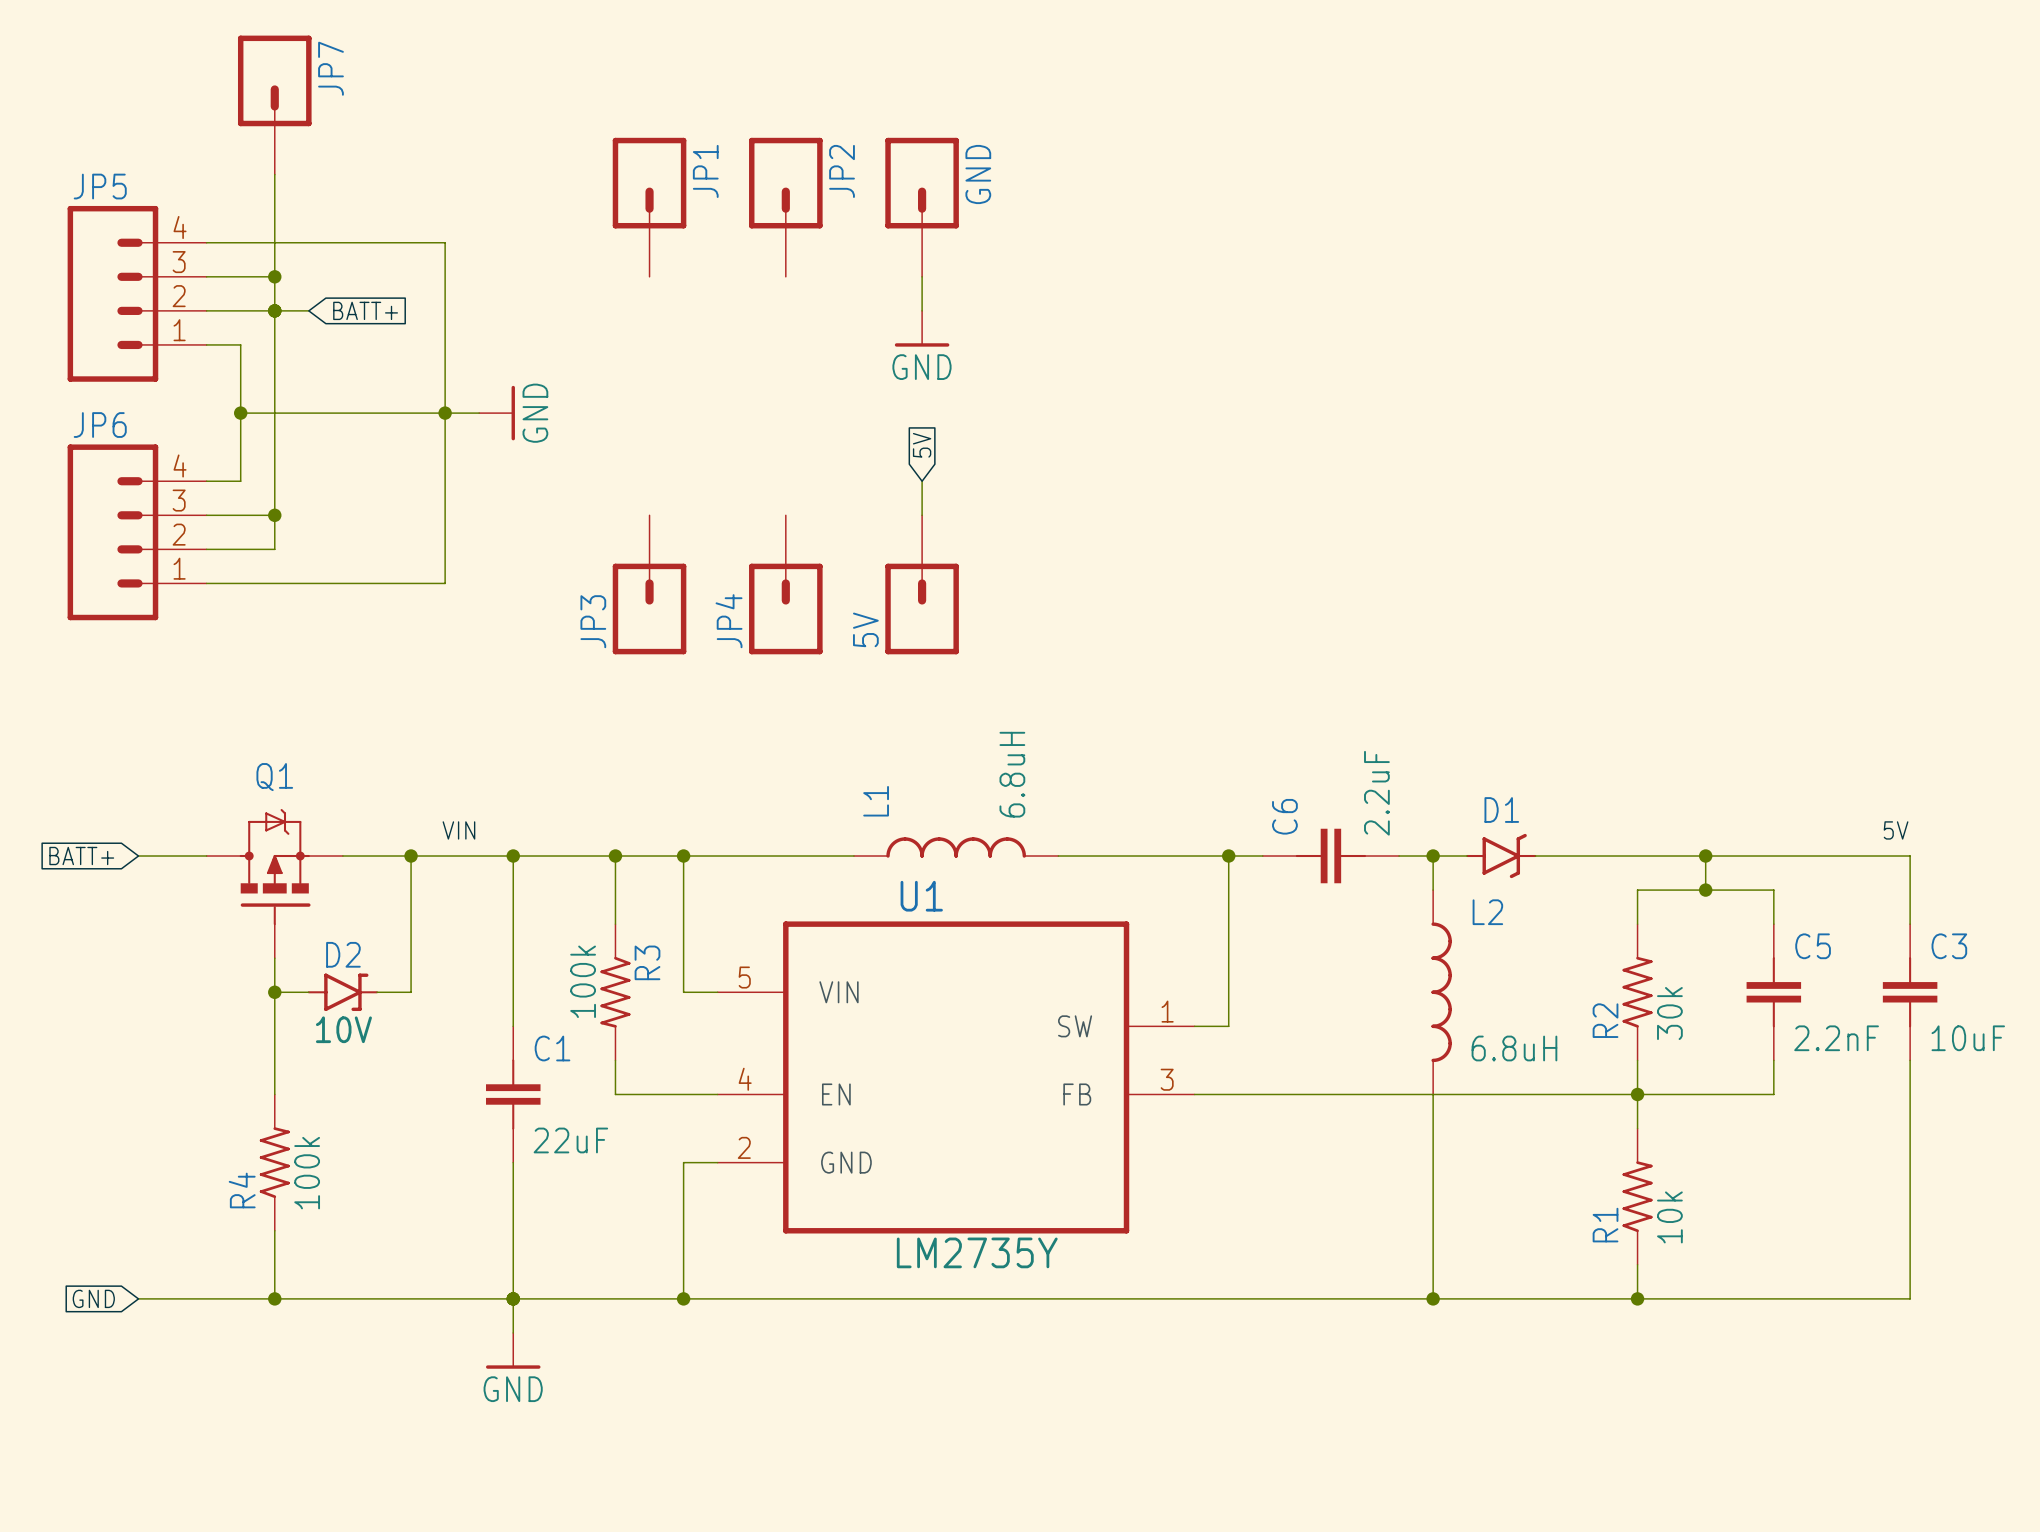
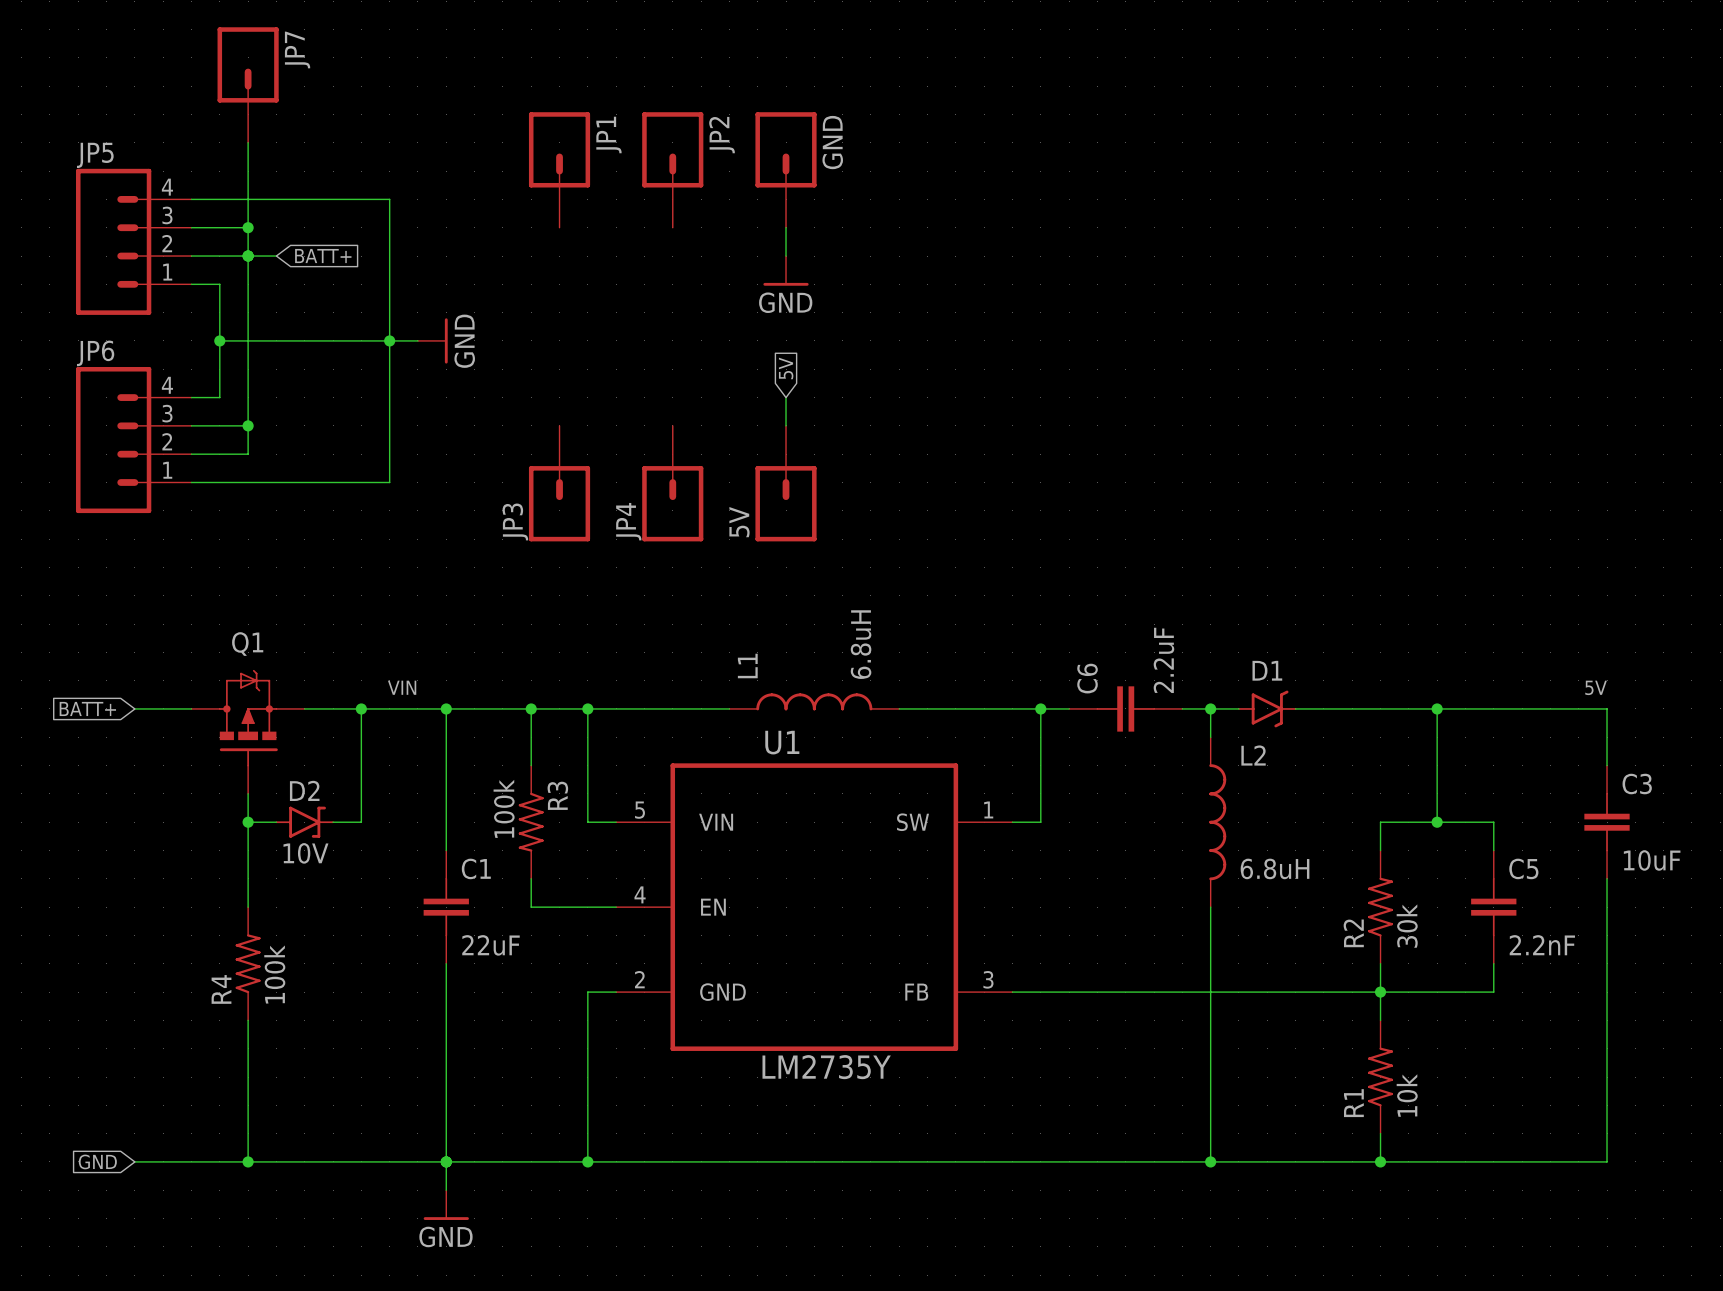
wire: none -> (1437, 737) (1437, 822)
junction: (1705, 890) -> none
U1 symbol: [717, 921, 1195, 1234] -> [616, 763, 1013, 1051]
wire: (1637, 924) (1637, 890) (1773, 890) (1773, 924) -> (1380, 850) (1380, 822) (1493, 822) (1493, 850)
wire: (1228, 992) (1228, 1026) (1194, 1026) -> (1040, 822) (1012, 822)
R2 position: (1637, 992) -> (1380, 907)
junction: none -> (1437, 822)
C5 position: (1773, 992) -> (1493, 907)
wire: (1637, 1060) (1637, 1128) -> (1380, 963) (1380, 1020)
wire: (1773, 1060) (1773, 1094) (1194, 1094) -> (1493, 963) (1493, 992) (1012, 992)
junction: (1637, 1094) -> none
wire: (717, 1162) (683, 1162) (683, 1196) -> (616, 992) (587, 992)
R1 position: (1637, 1196) -> (1380, 1077)
junction: none -> (1380, 992)
wire: (1637, 1264) (1637, 1298) -> (1380, 1133) (1380, 1161)
global label position: GND (93, 1298) -> GND (97, 1161)
wire: (138, 1298) (1910, 1298) -> (134, 1161) (1607, 1161) (1607, 1077)
wire: none -> (248, 1077) (248, 1161)
junction: (274, 1298) -> none
junction: (513, 1298) -> none
wire: none -> (587, 1077) (587, 1161)
junction: (683, 1298) -> none
wire: none -> (1210, 1077) (1210, 1161)
junction: (1433, 1298) -> none
junction: (1637, 1298) -> none
wire: none -> (446, 1105) (446, 1190)
power symbol position: GND (513, 1350) -> GND (446, 1205)
junction: none -> (248, 1161)
junction: none -> (446, 1161)
junction: none -> (587, 1161)
junction: none -> (1210, 1161)
junction: none -> (1380, 1161)

